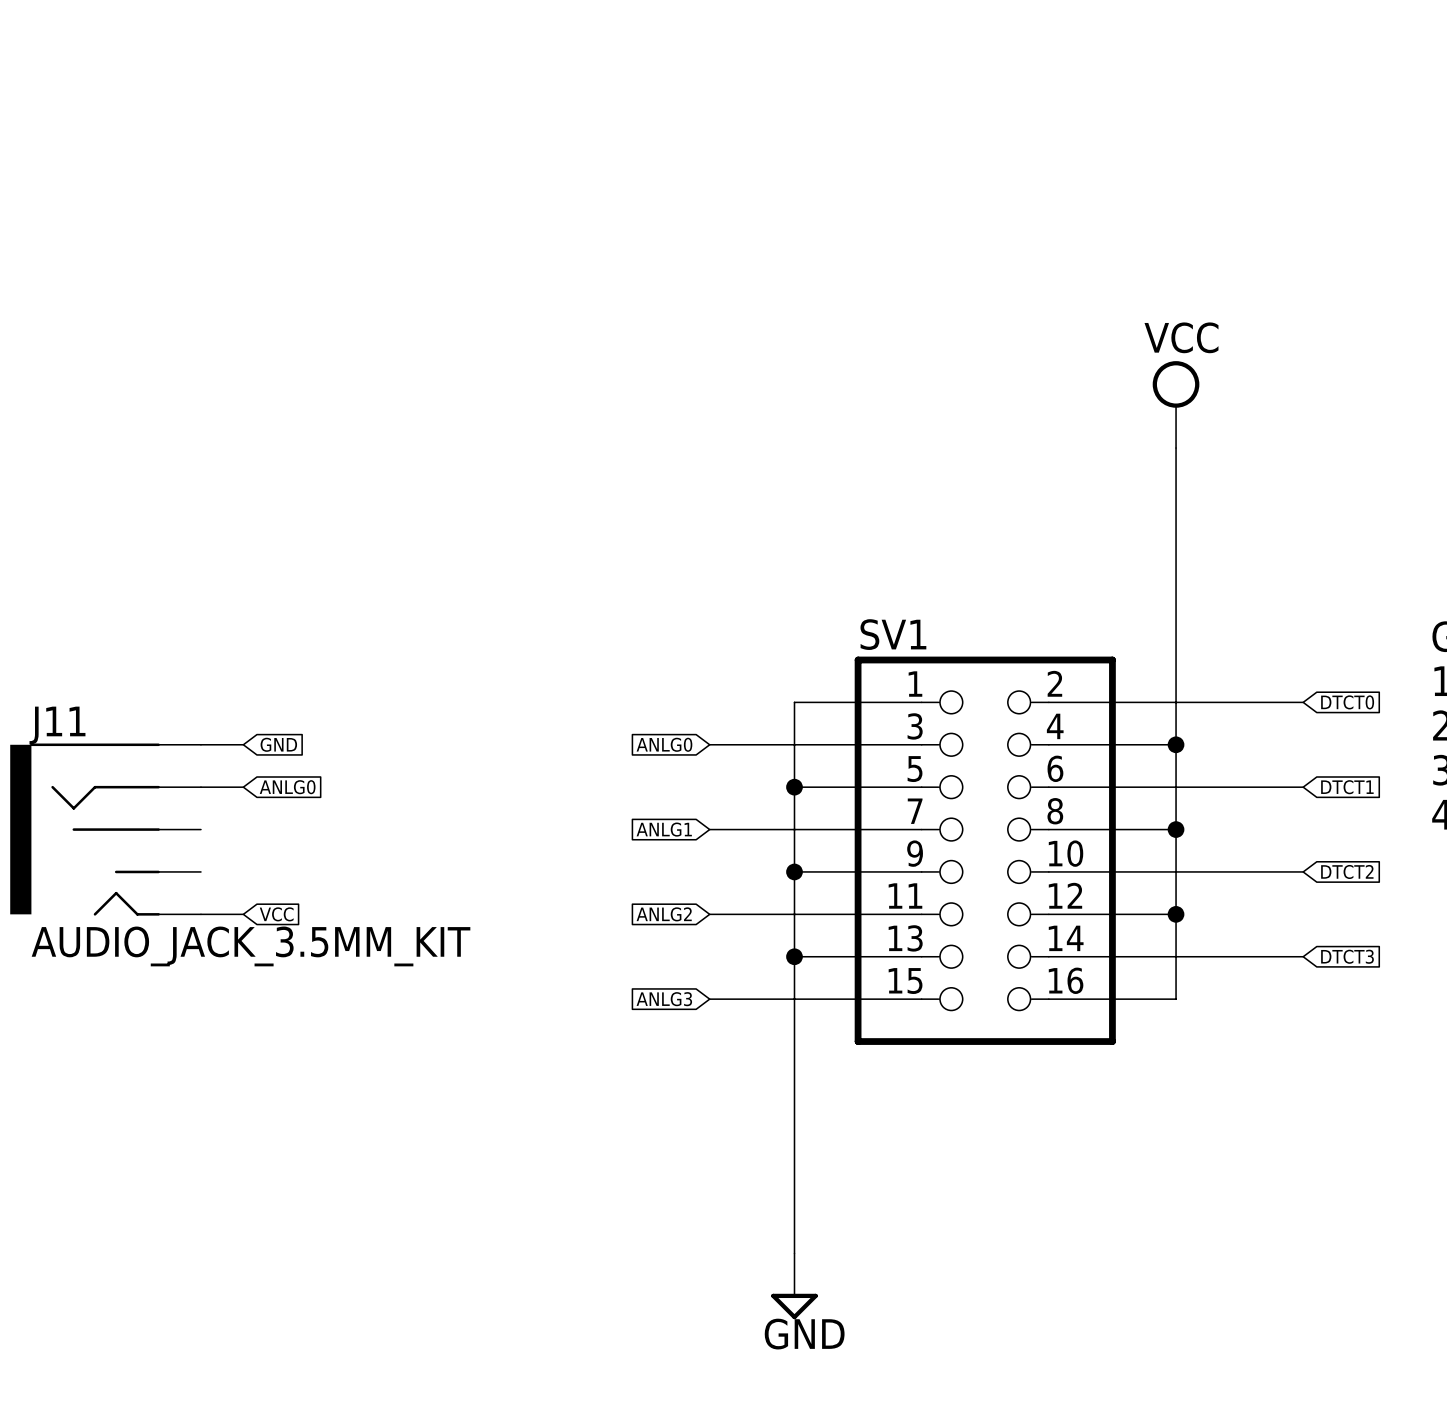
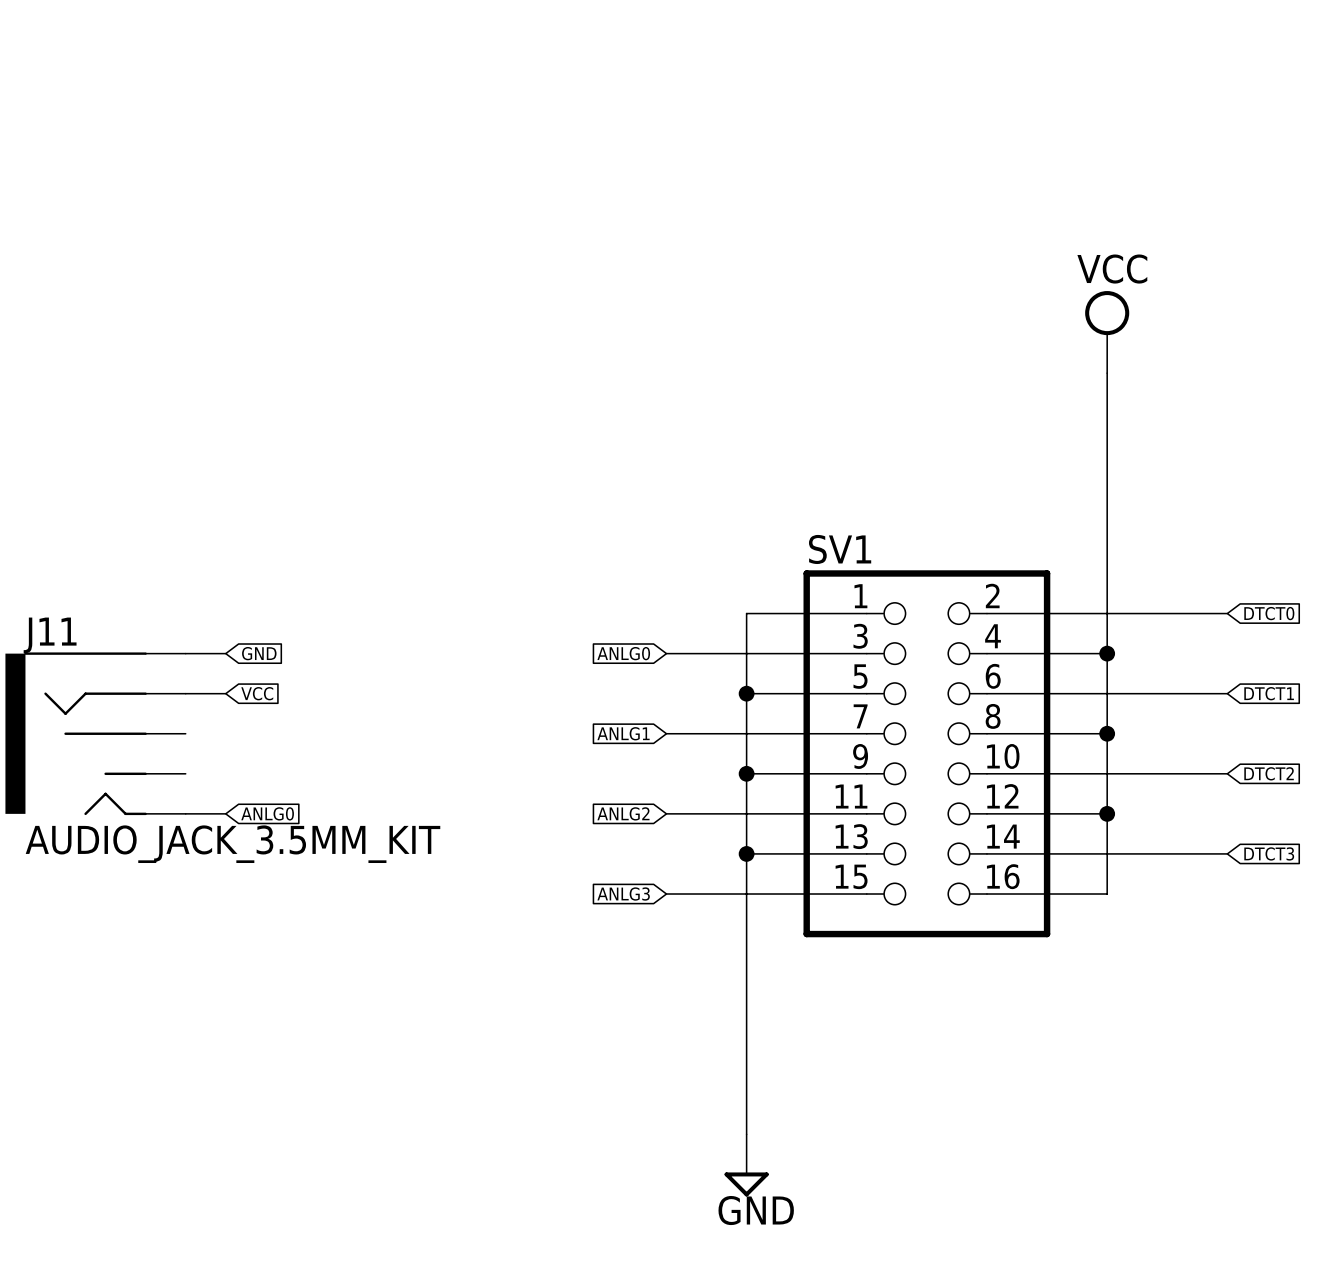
global label: ANLG0 (287, 787) -> VCC (257, 693)
global label: VCC (276, 914) -> ANLG0 (267, 813)

